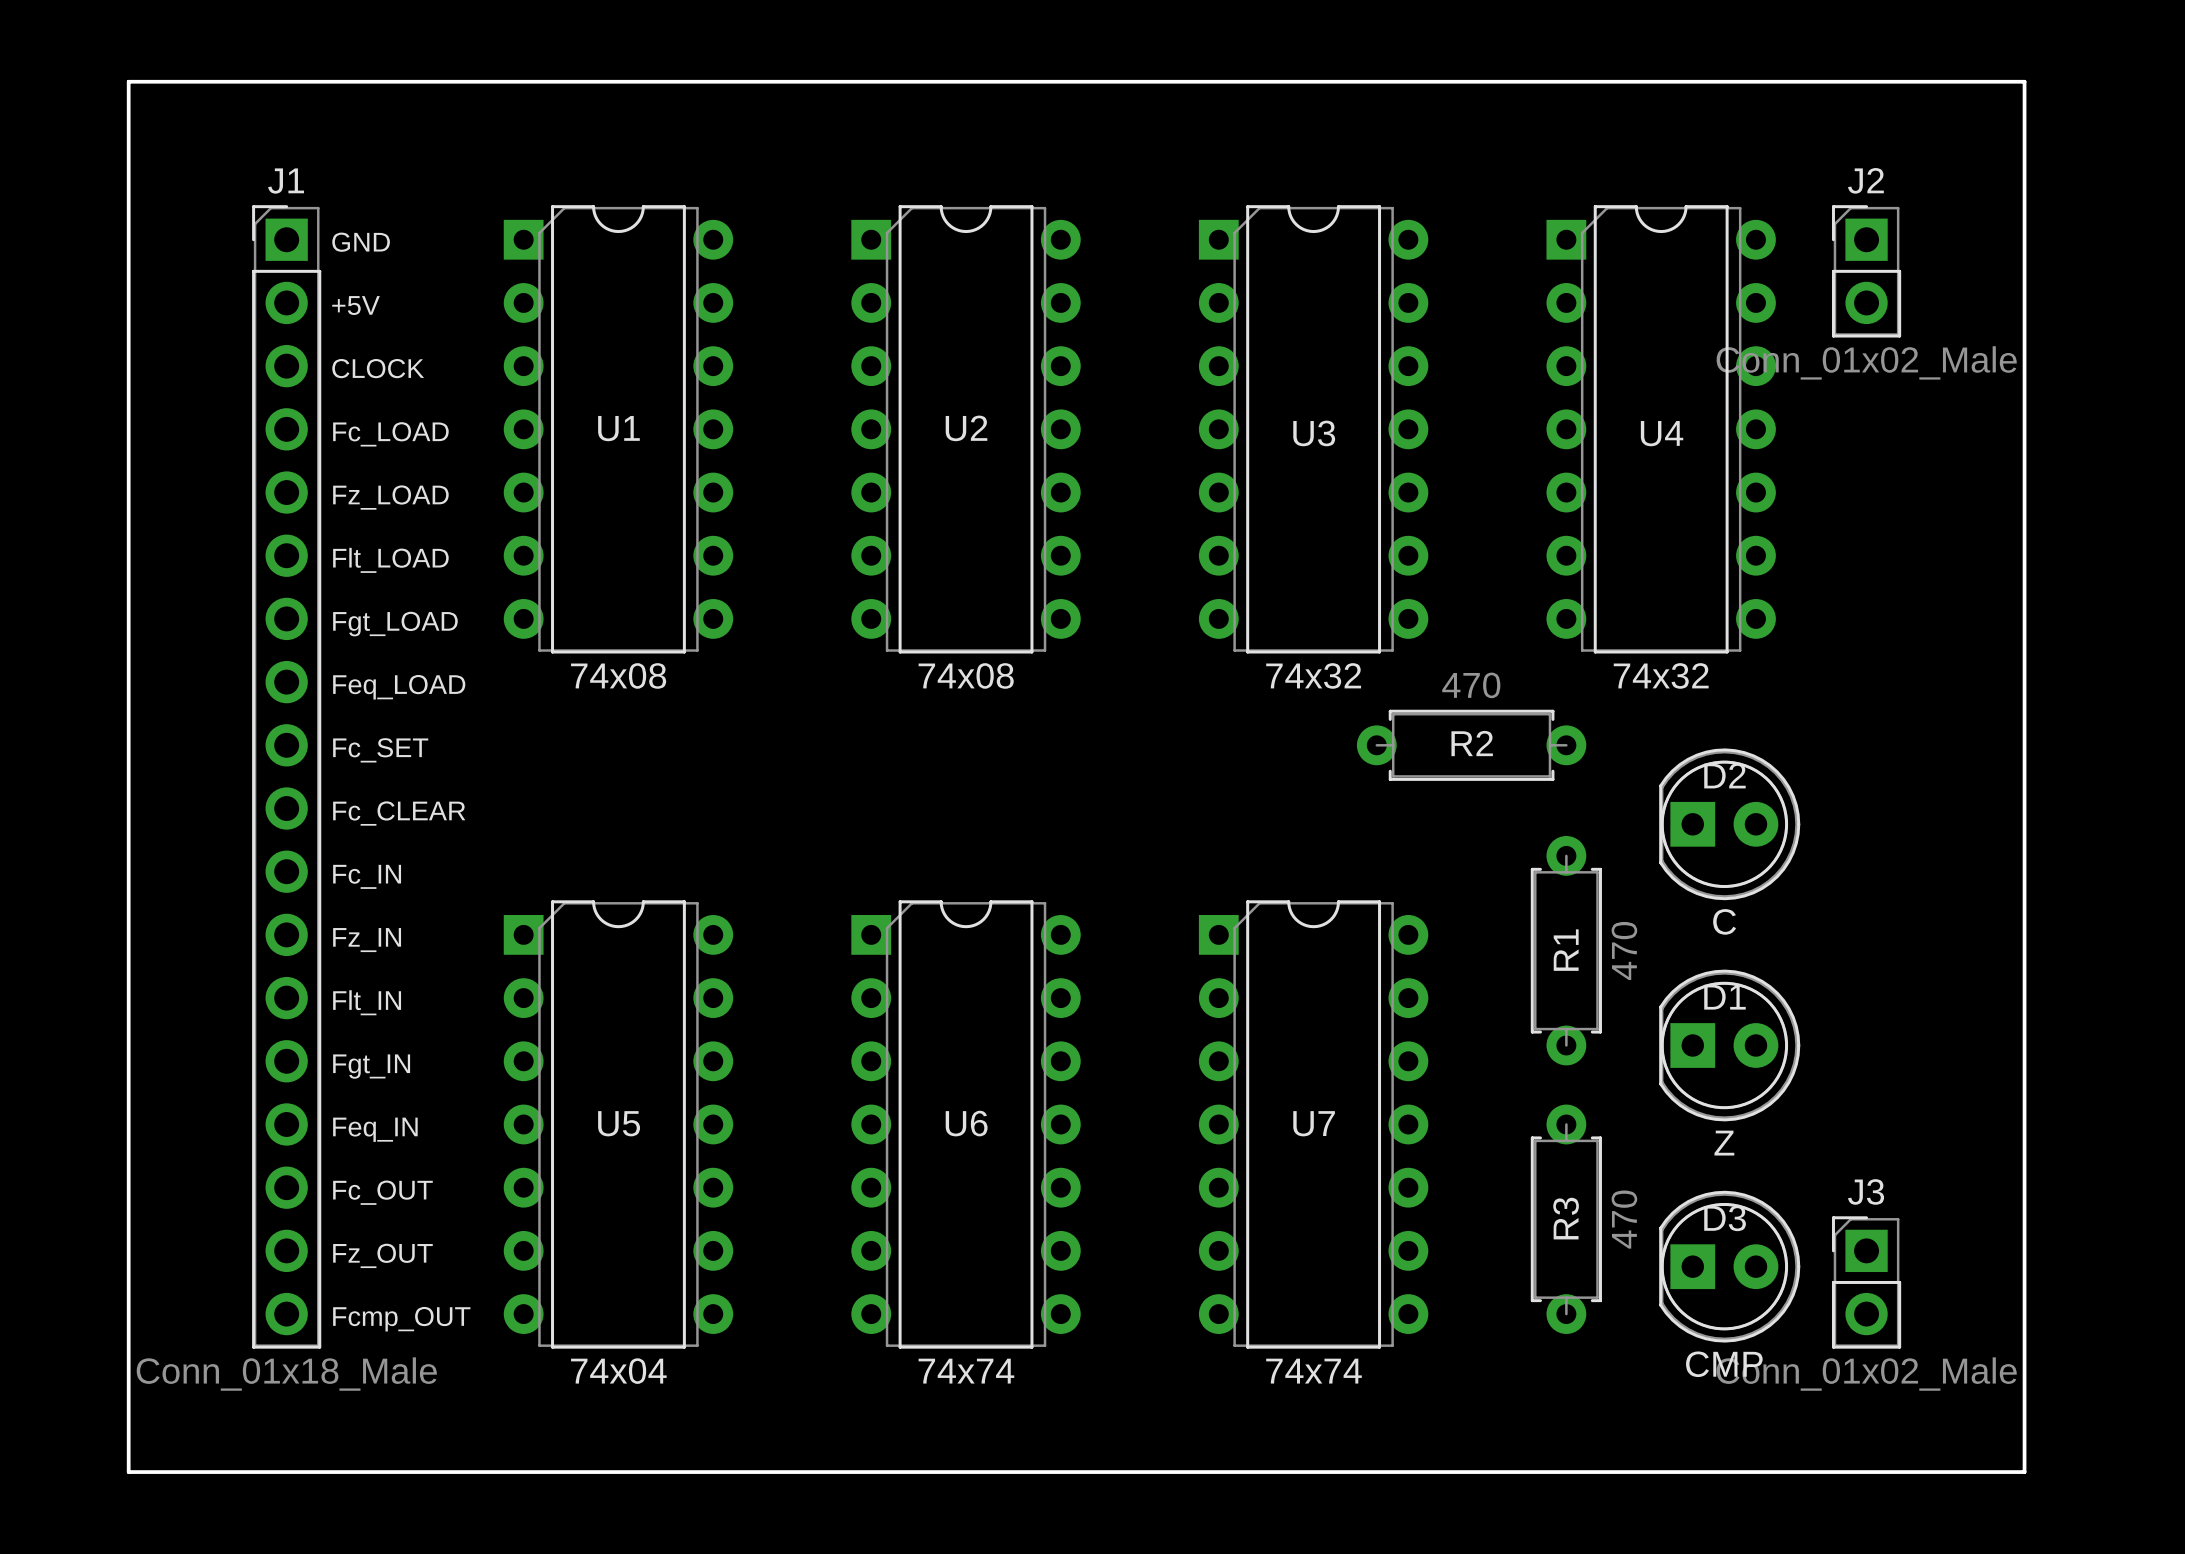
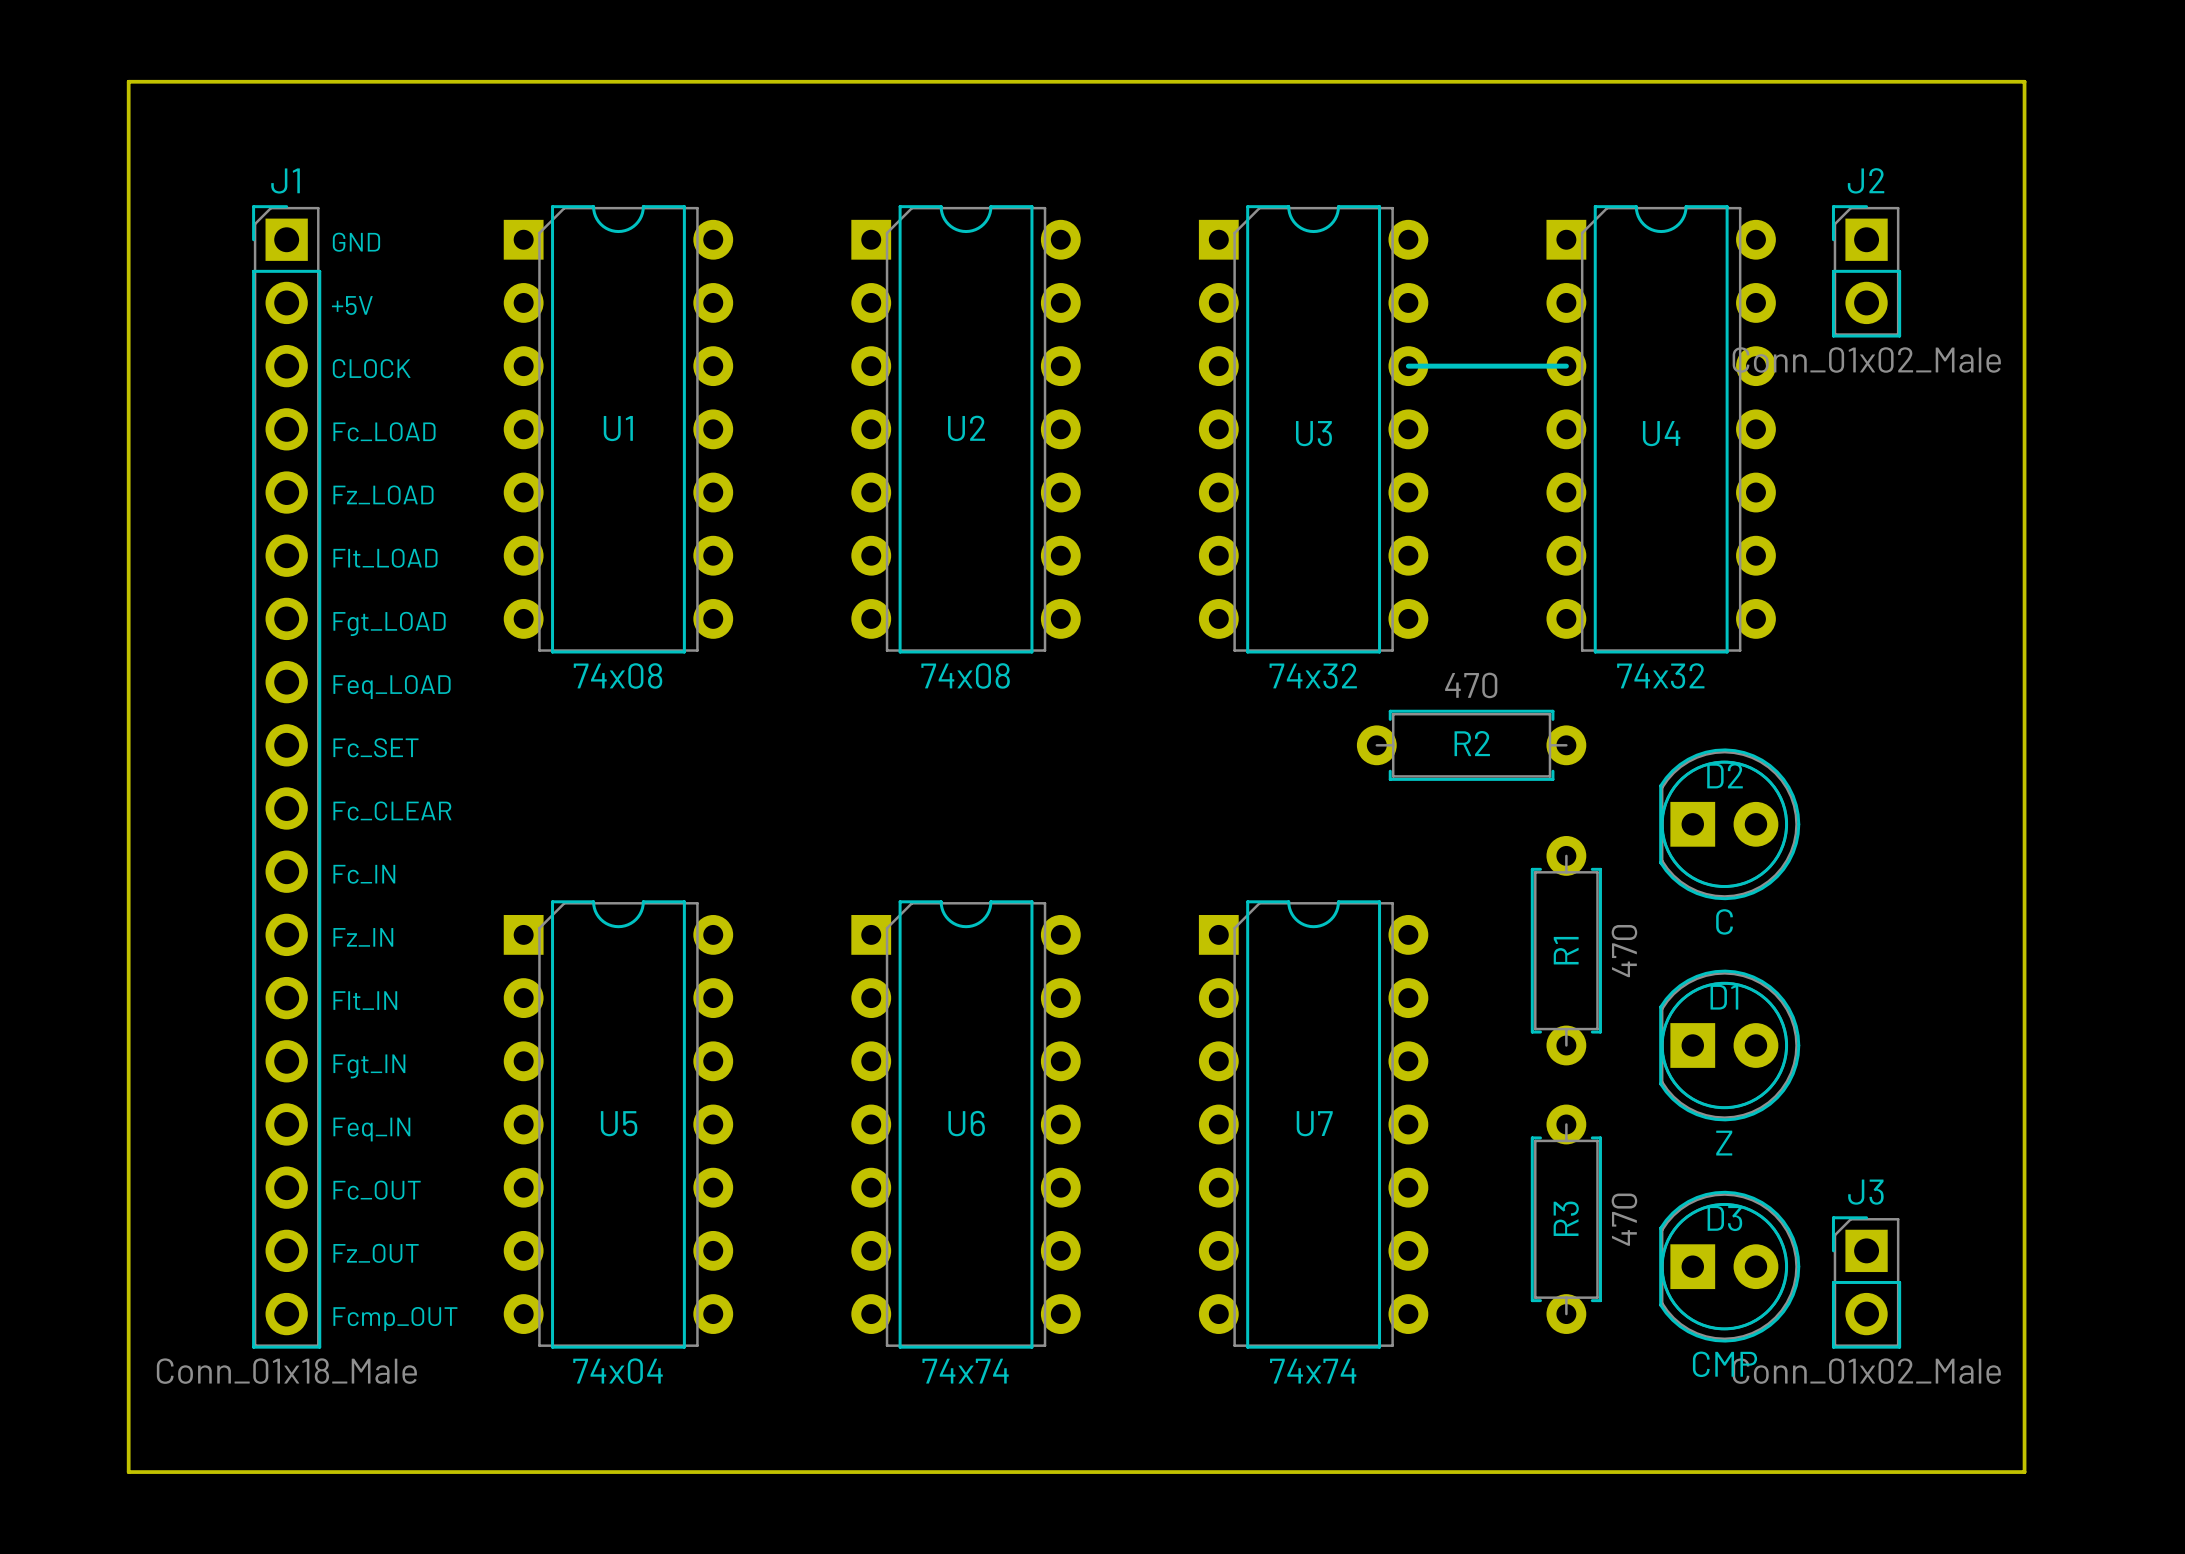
line: none -> (1408, 366) (1566, 366)

